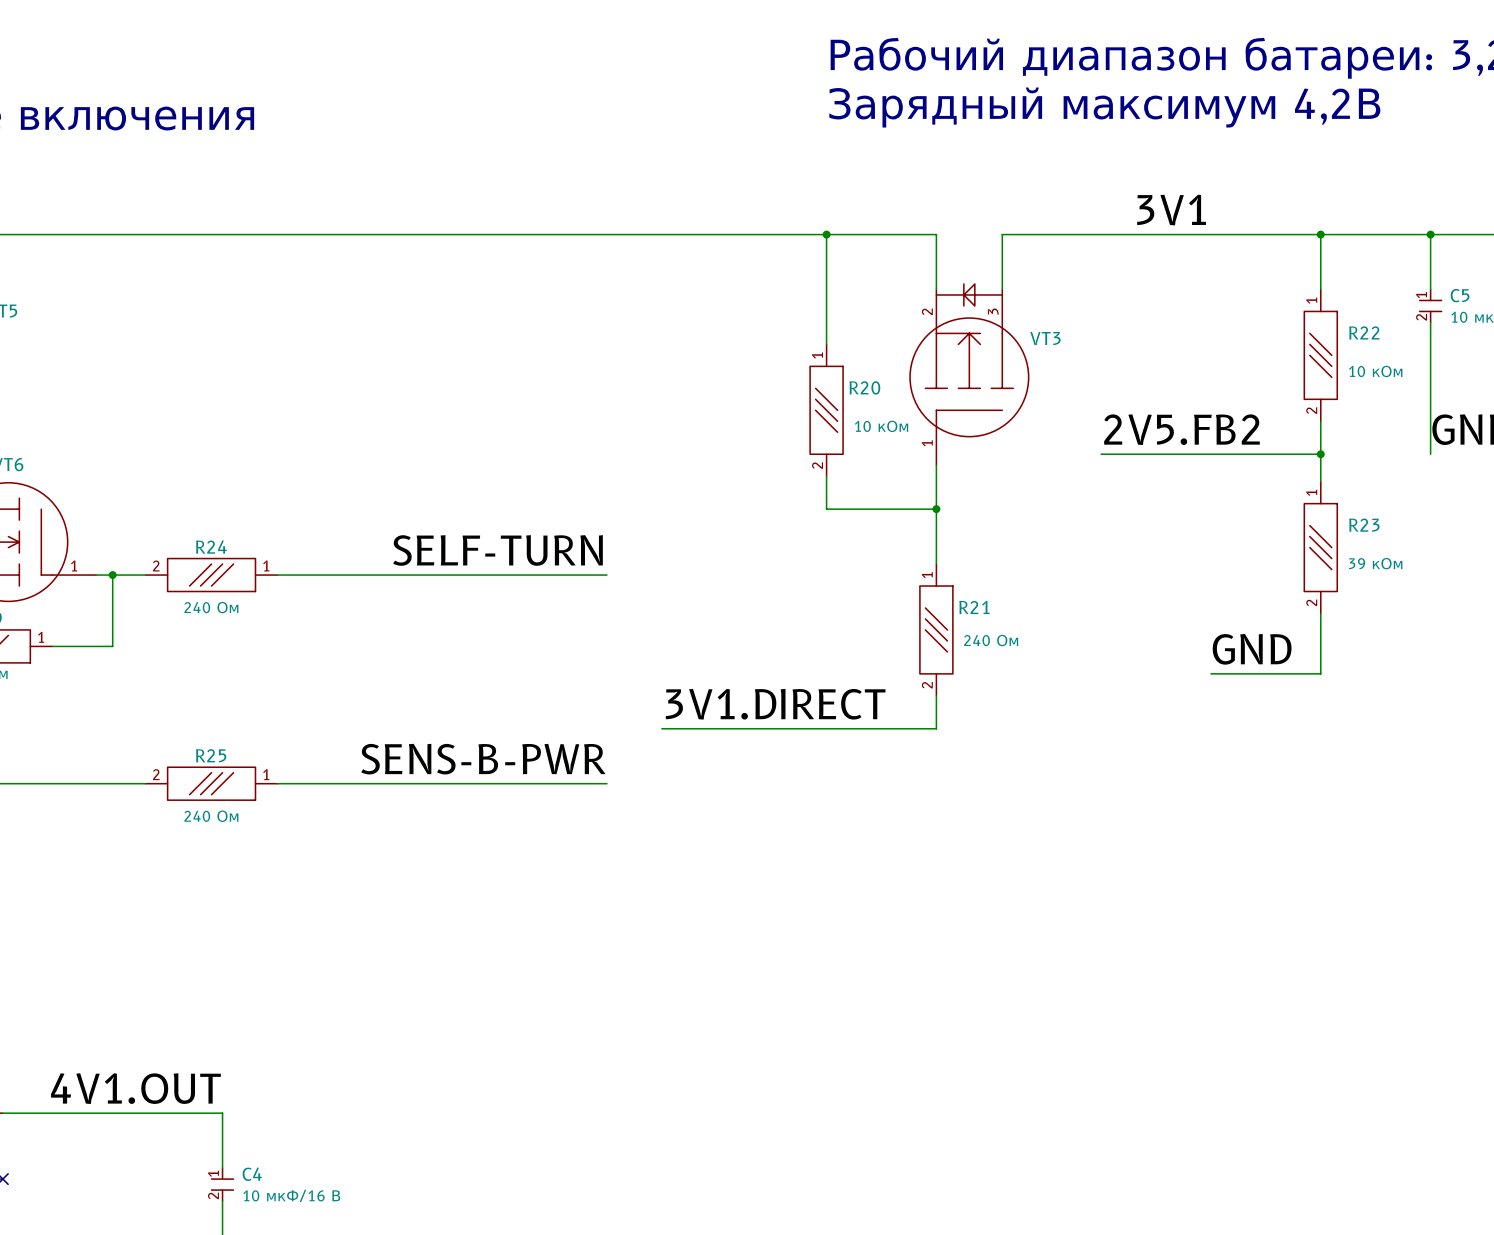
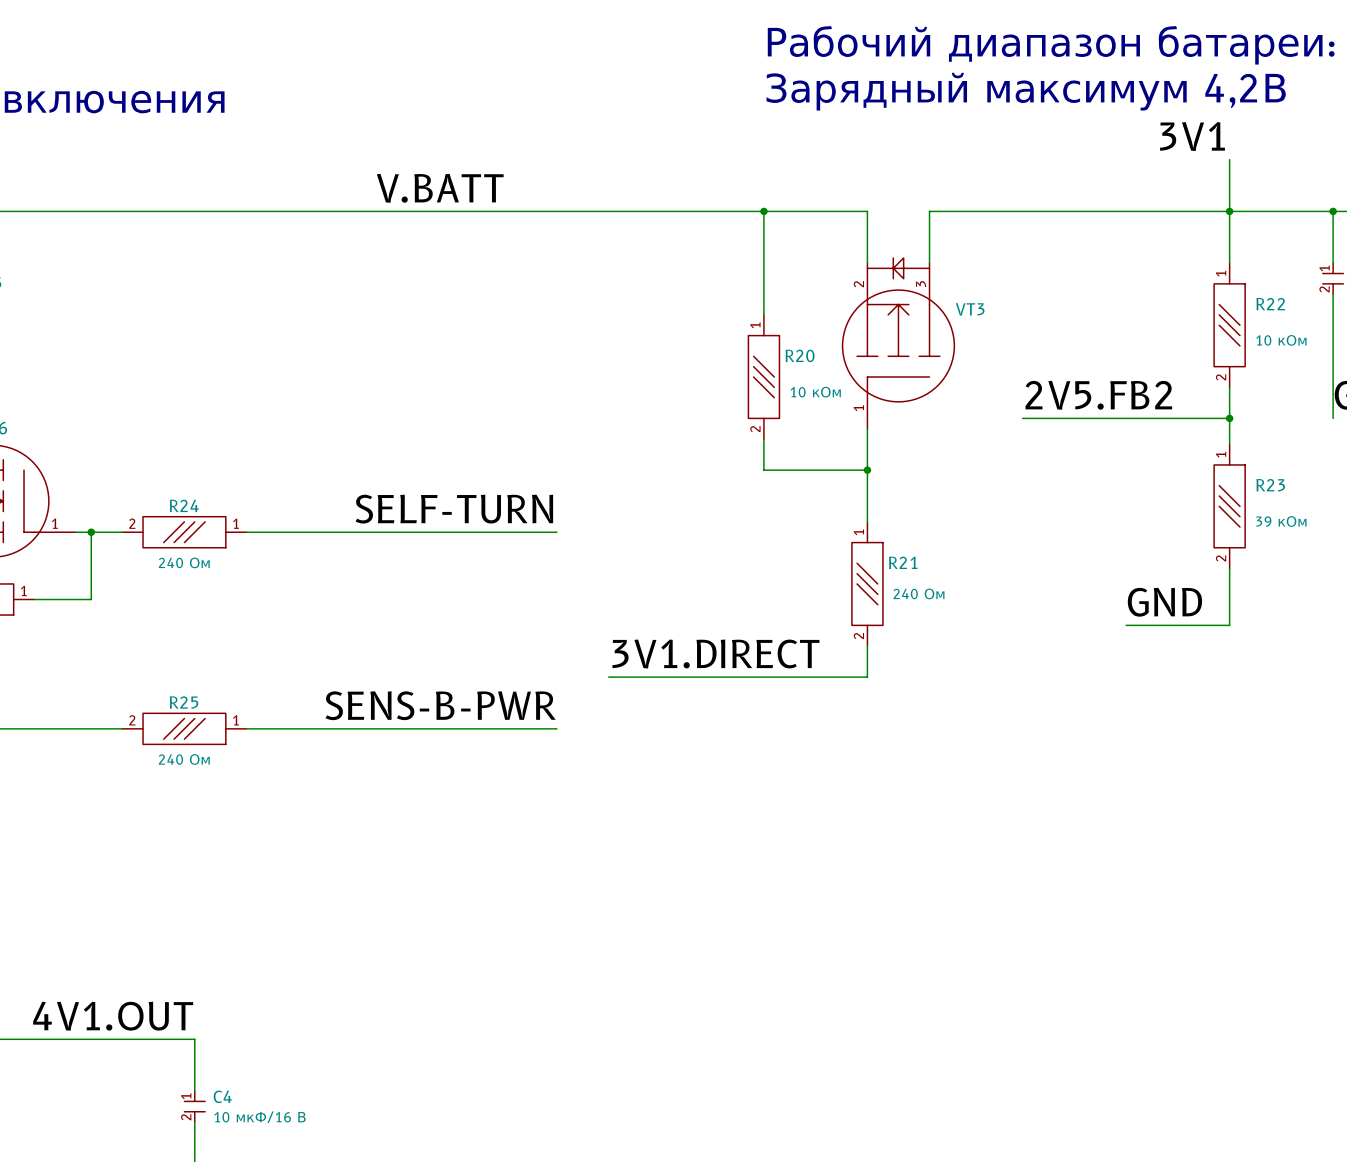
wire: none -> (1229, 159) (1229, 211)
label: none -> V.BATT (440, 188)
label position: 3V1 (1171, 210) -> 3V1 (1192, 136)

